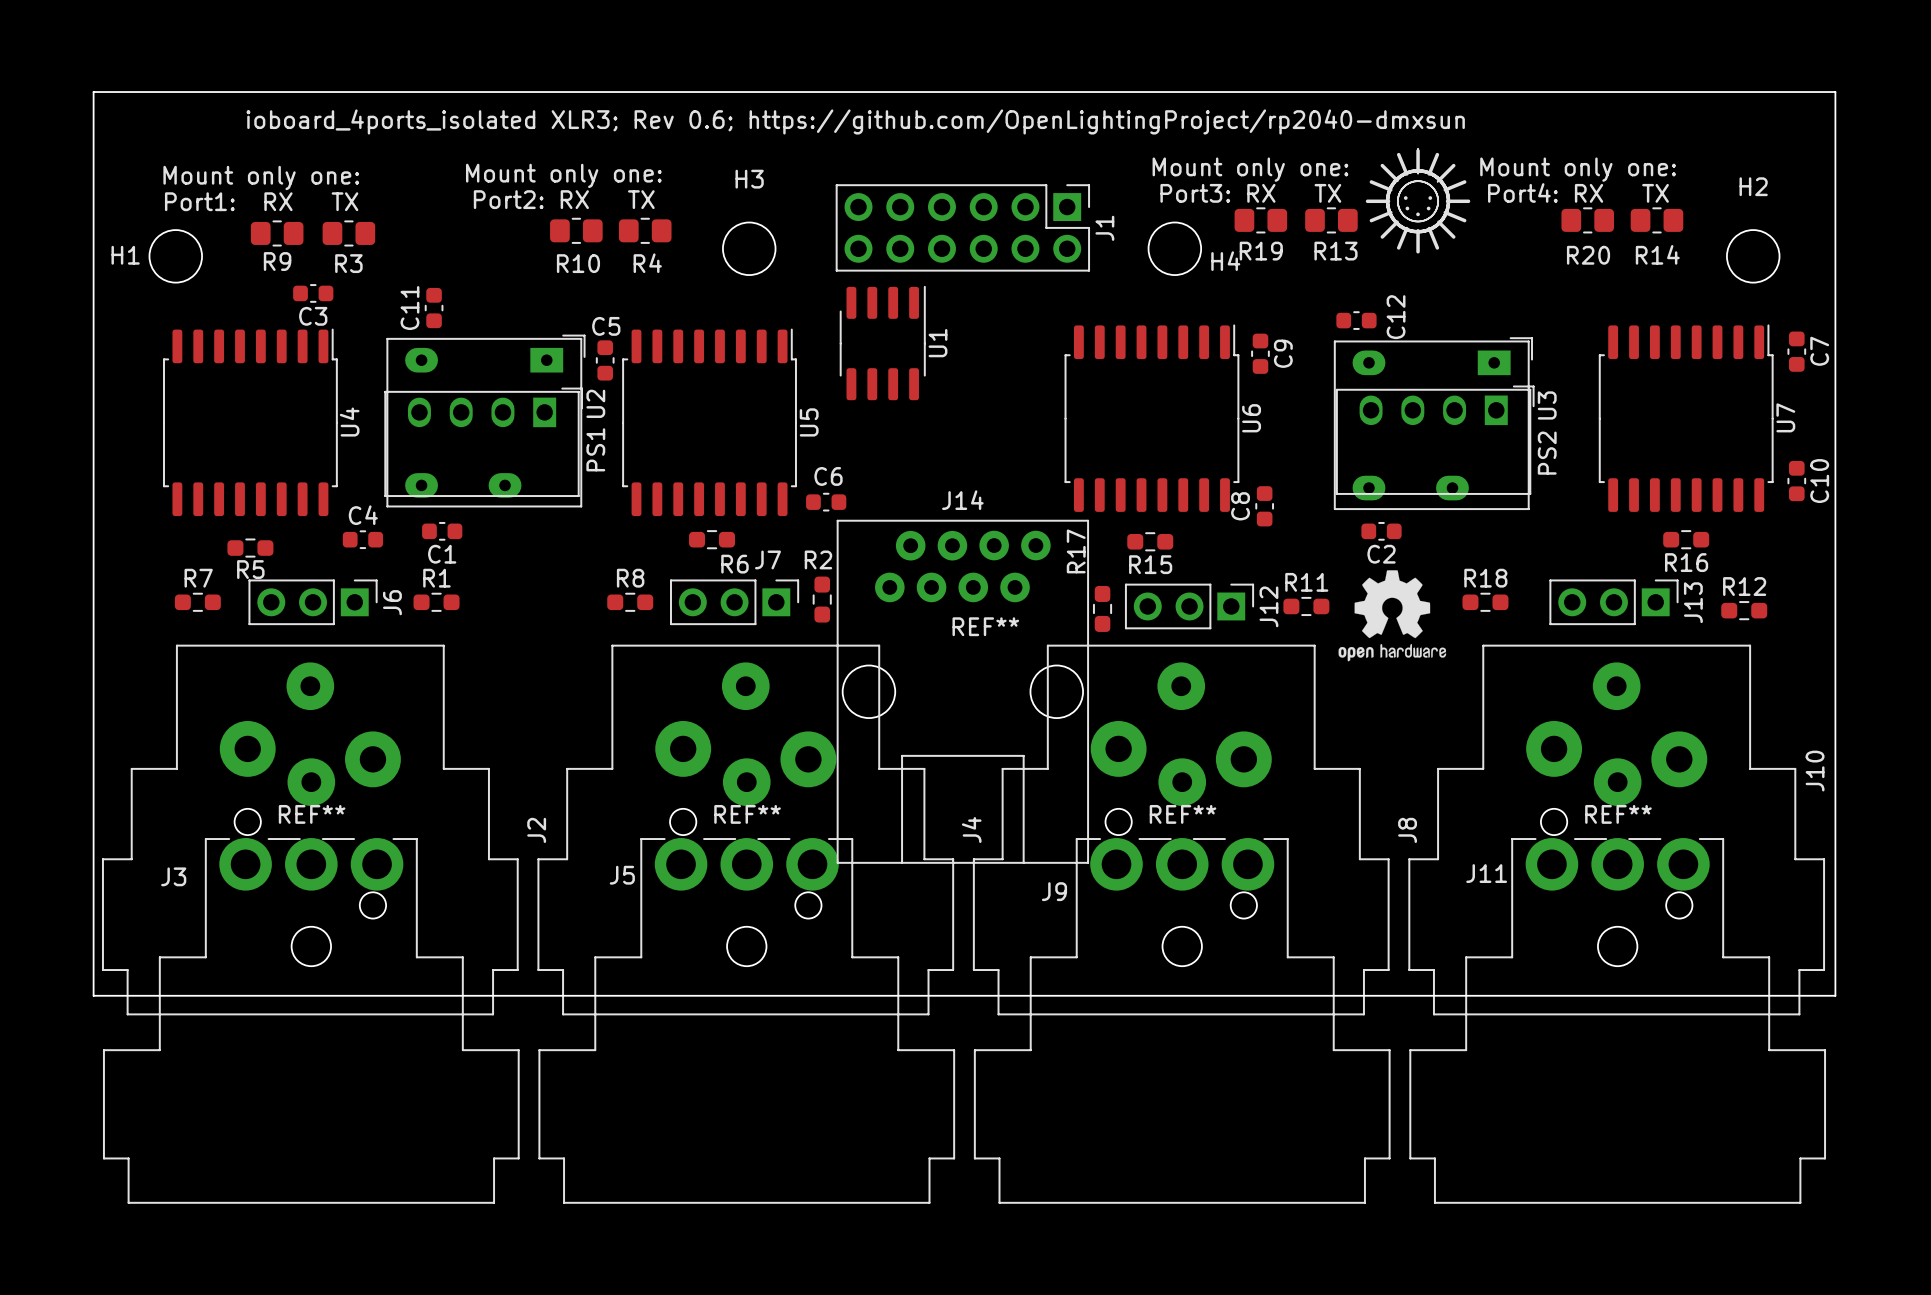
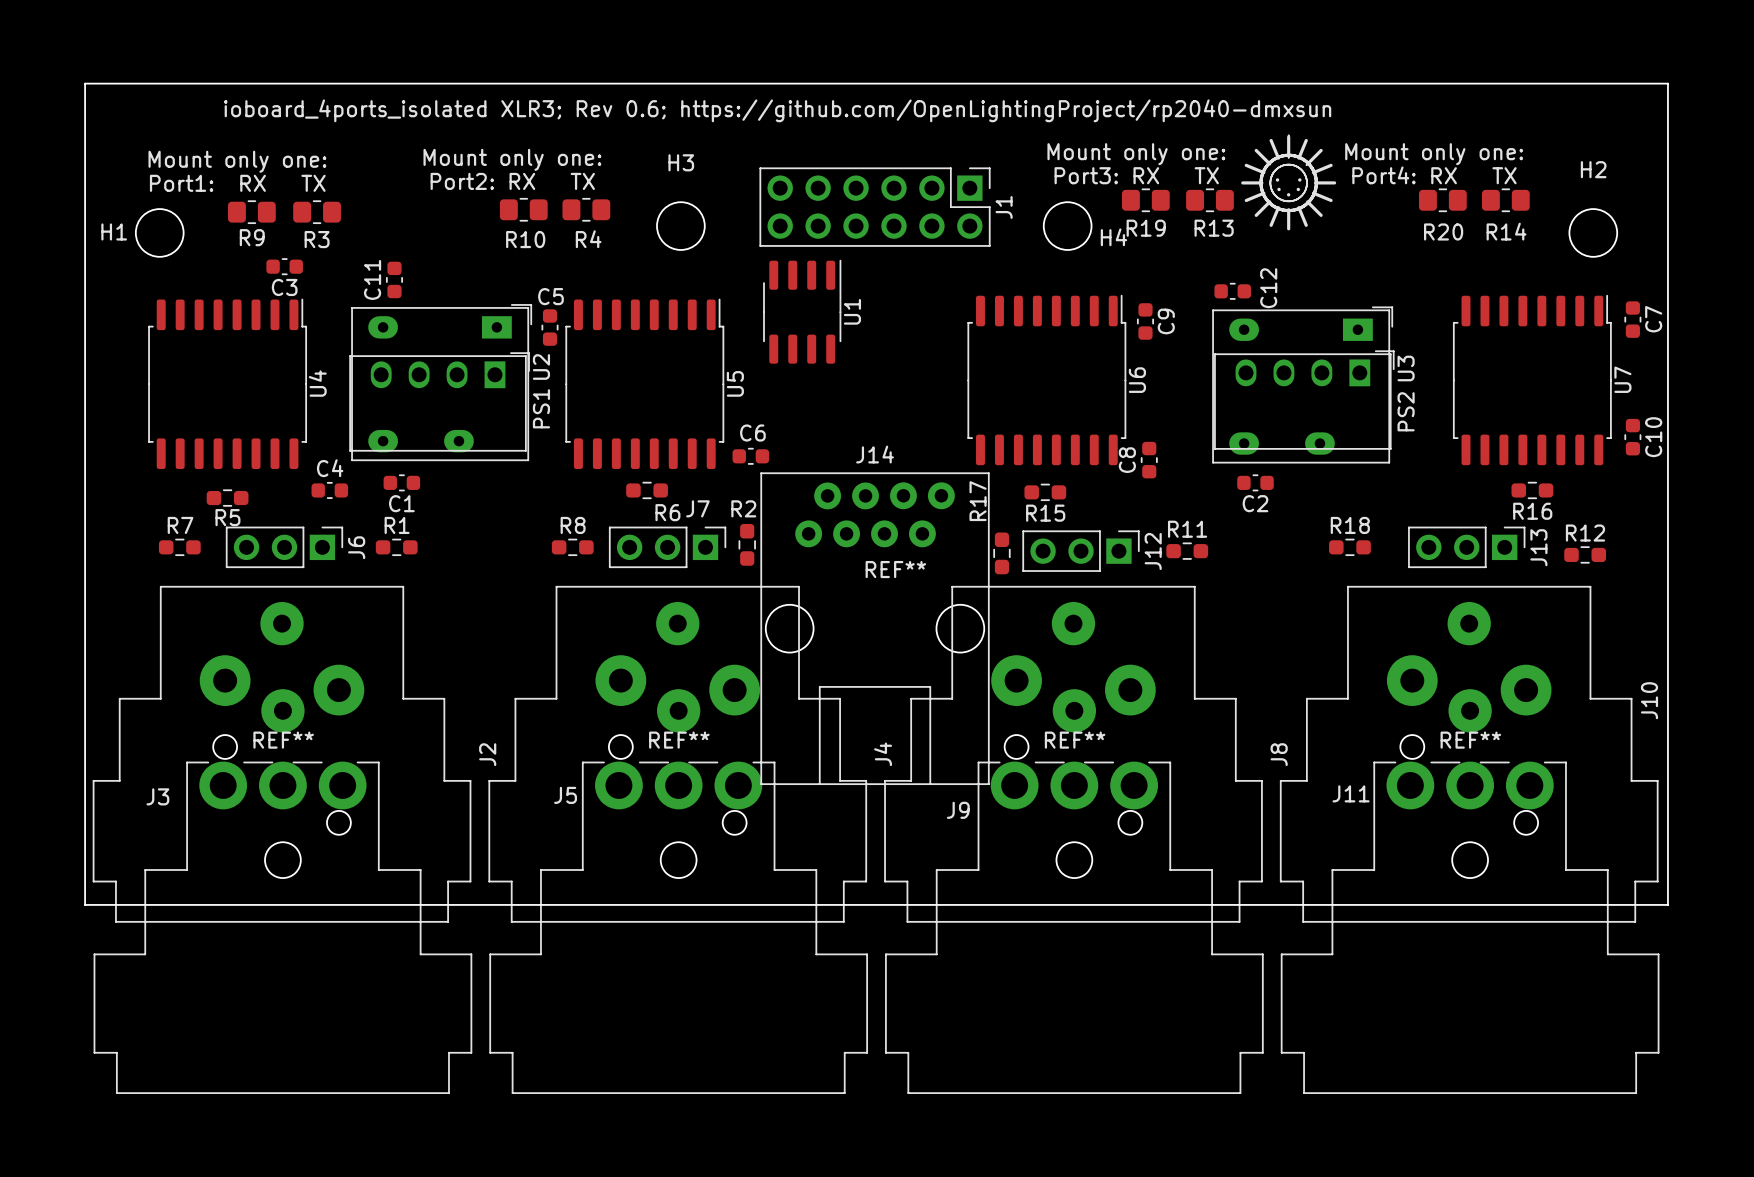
drawing: [1338, 570, 1447, 662] -> none

